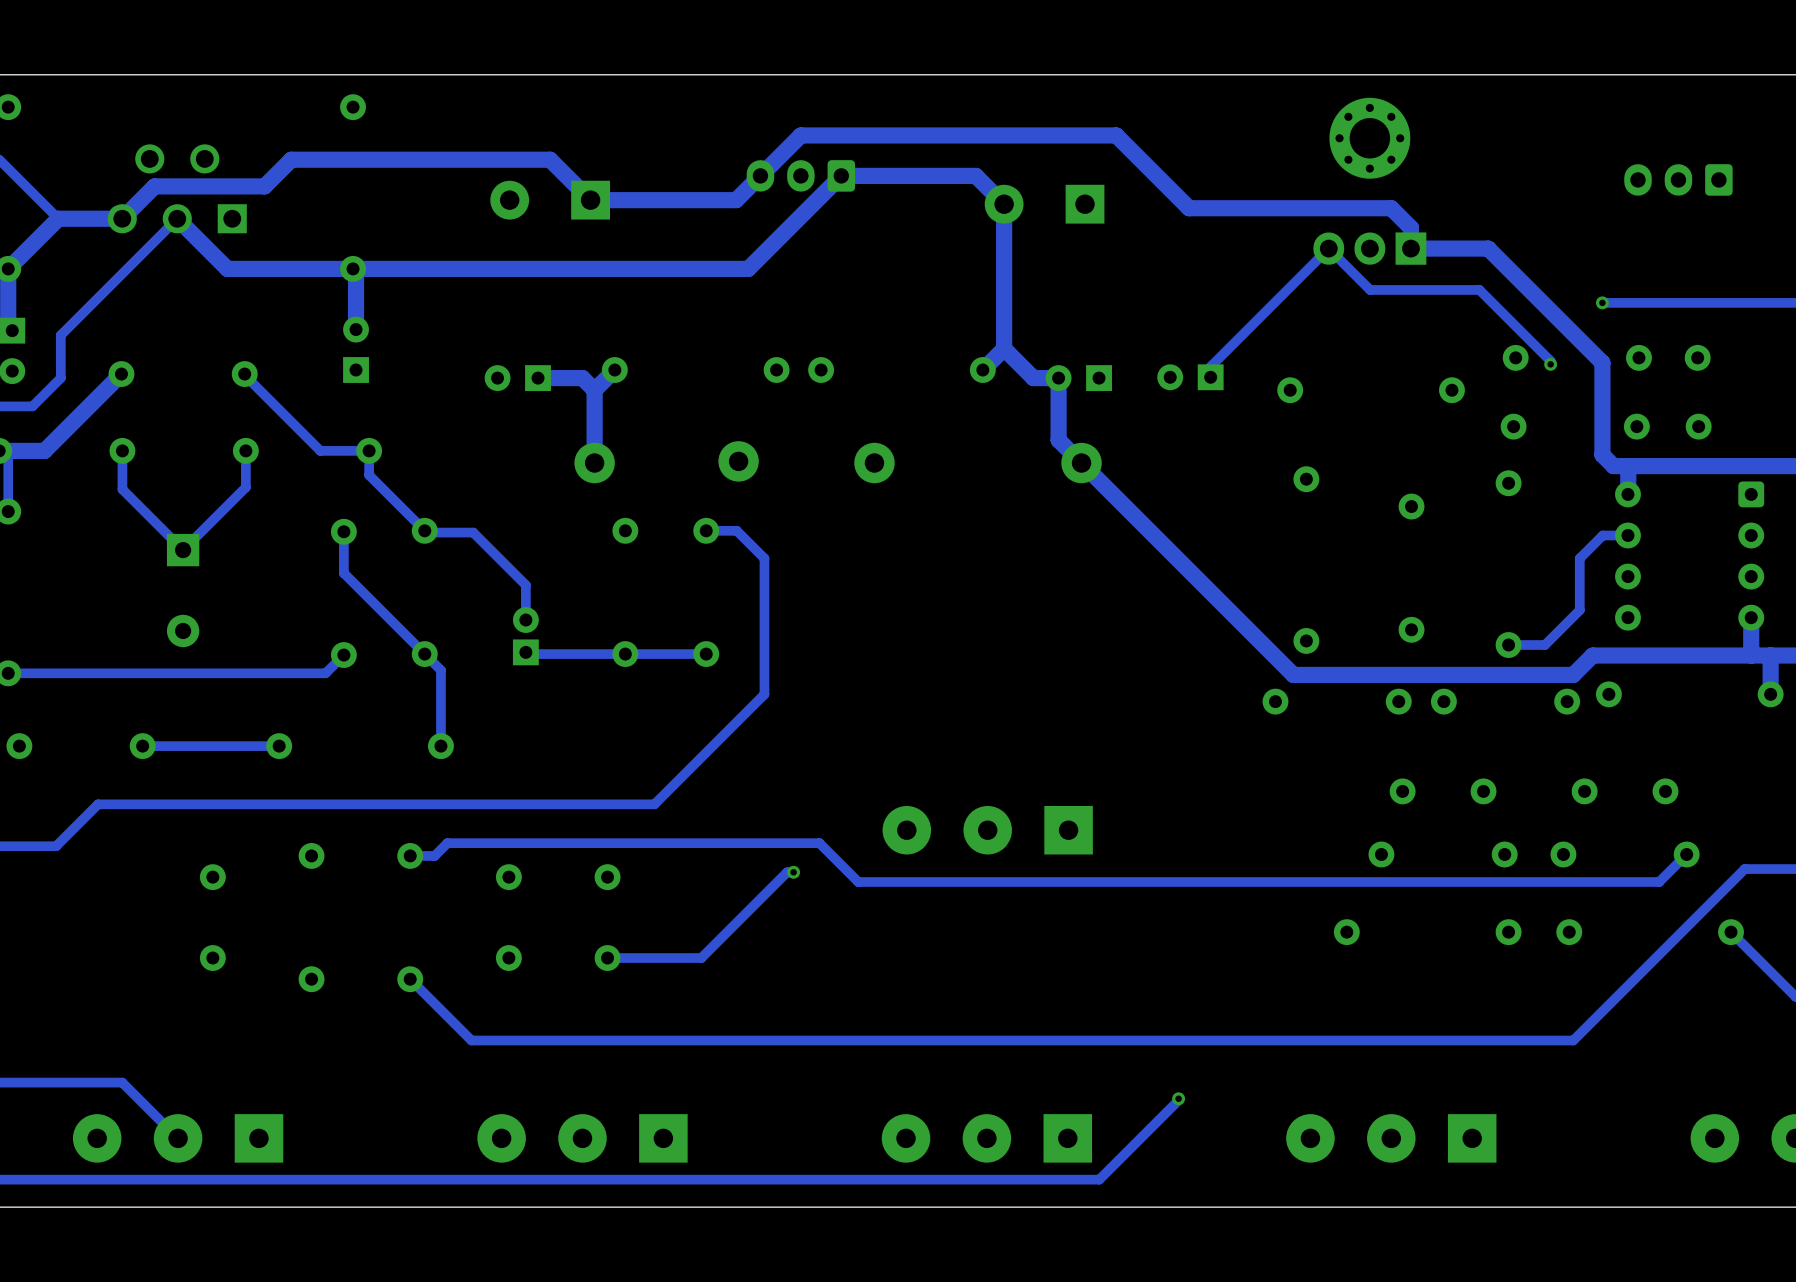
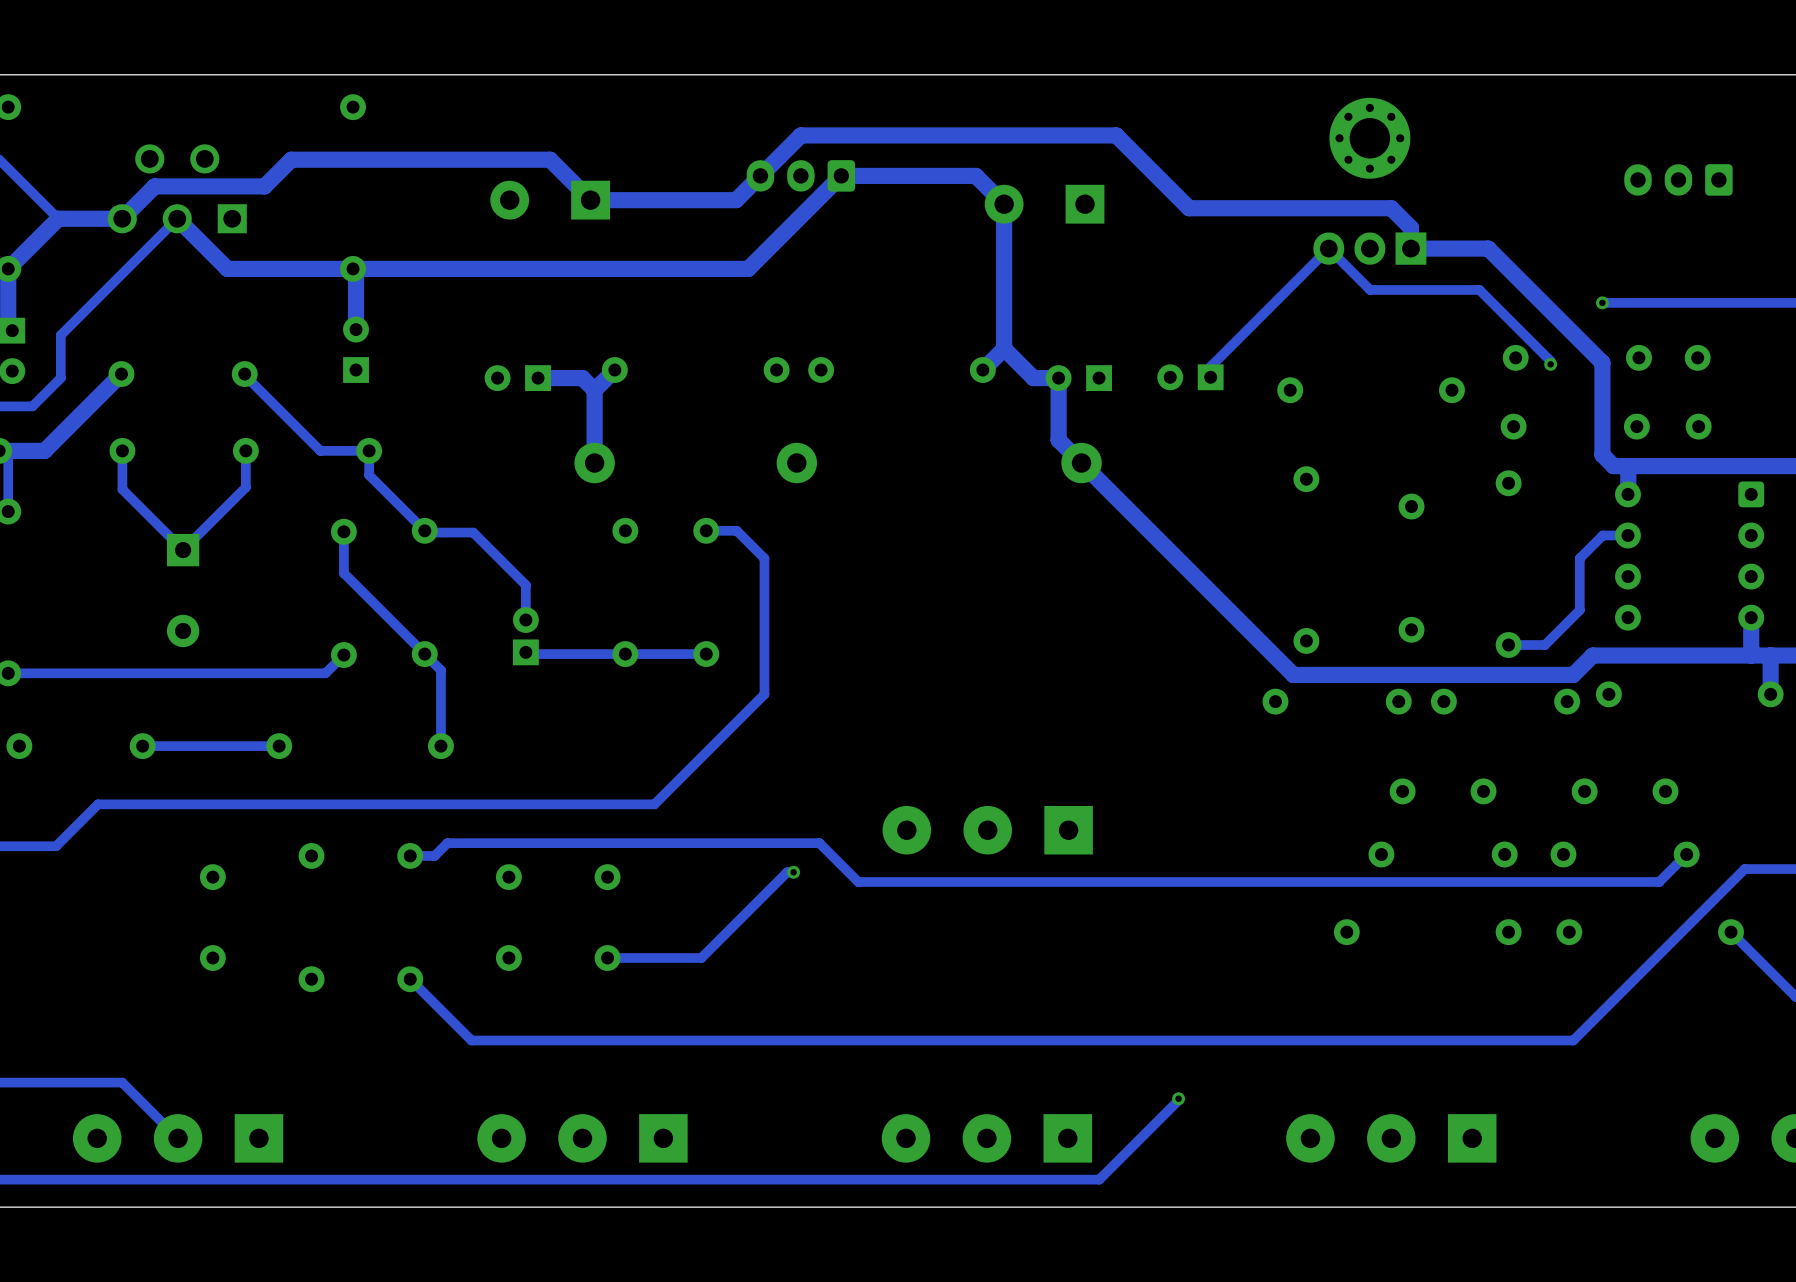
part: (738, 461) -> none
part: none -> (796, 463)
part: (874, 463) -> none

